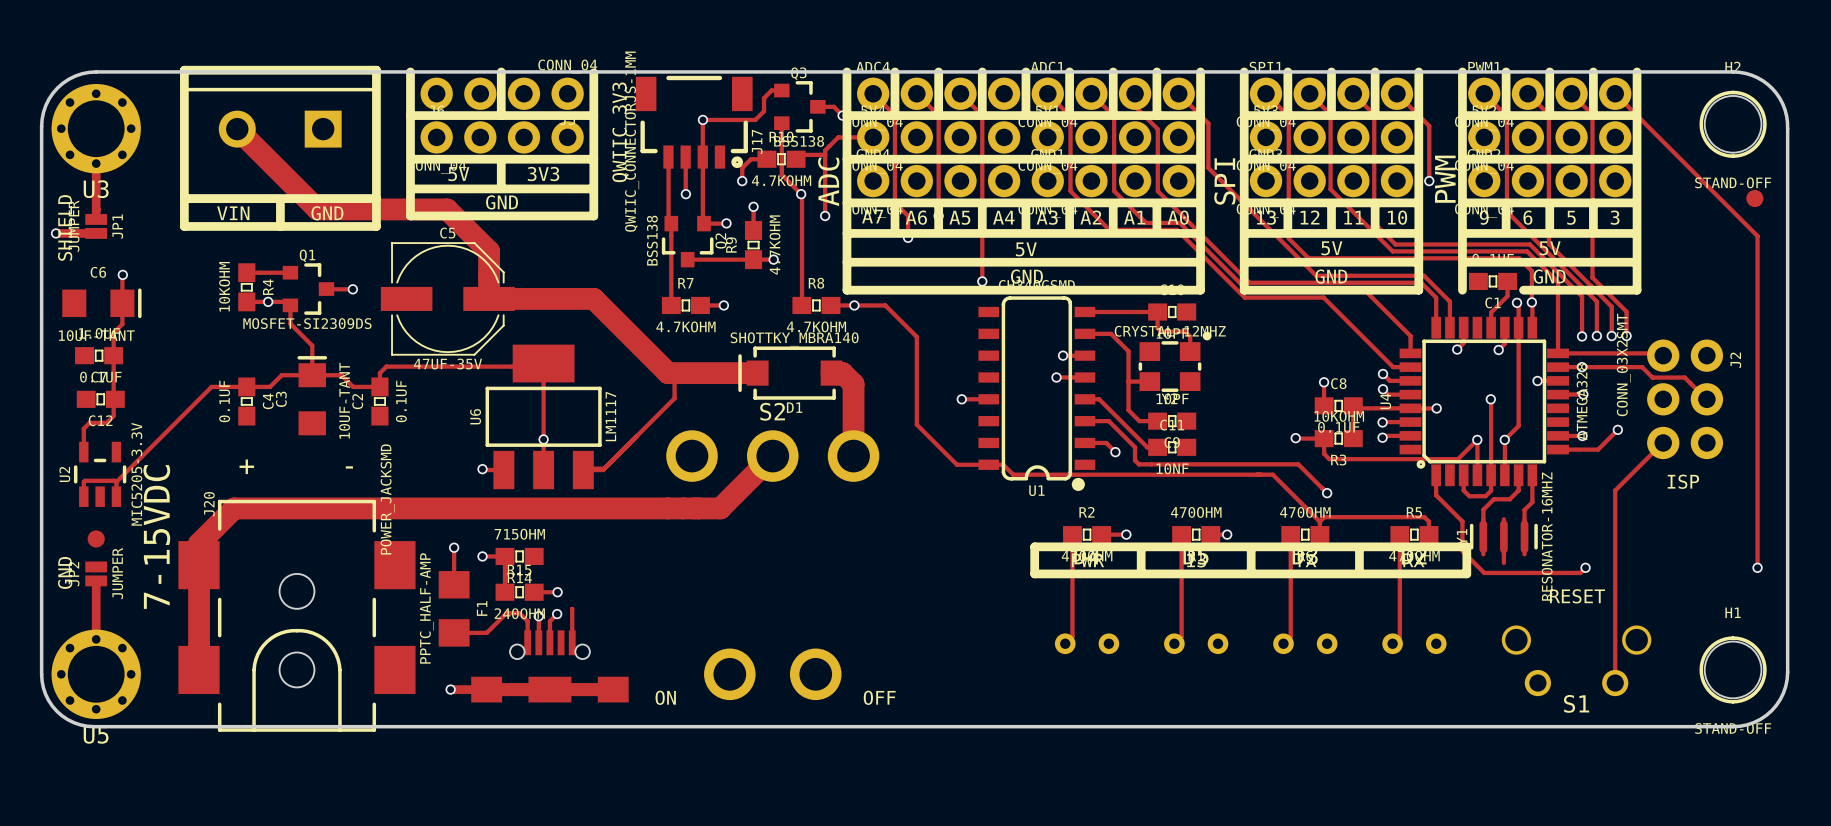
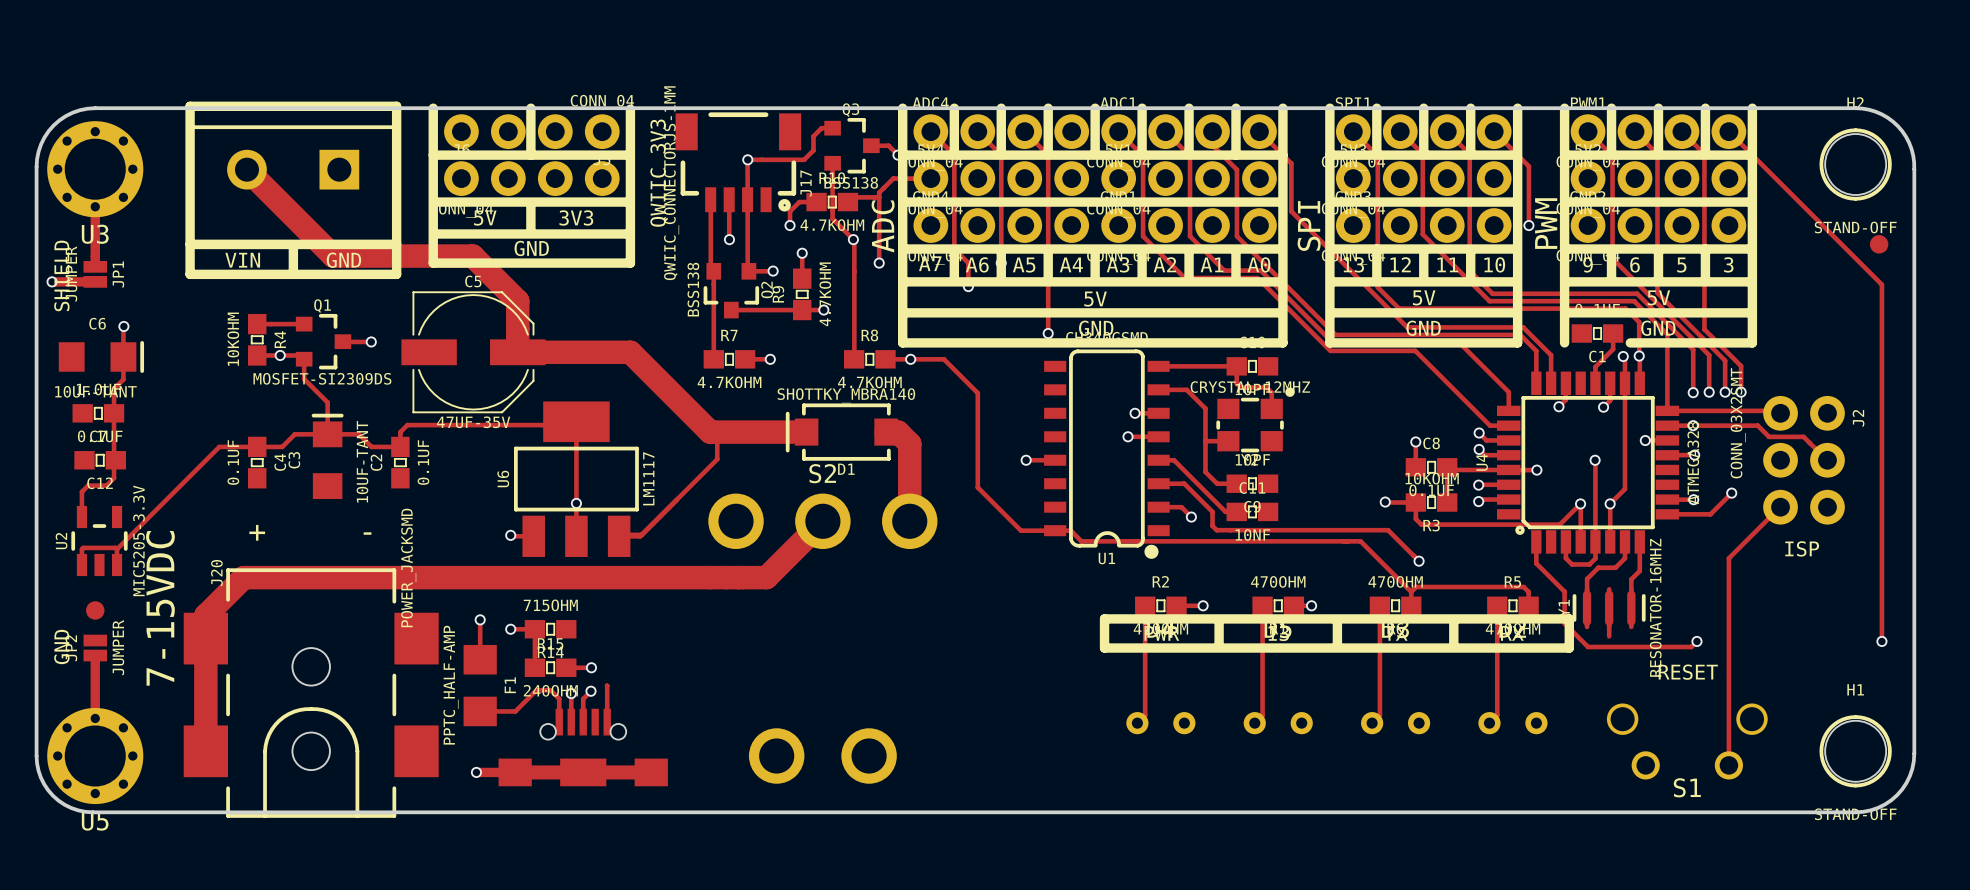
text: ON (665, 697) -> none
text: OFF (879, 697) -> none

